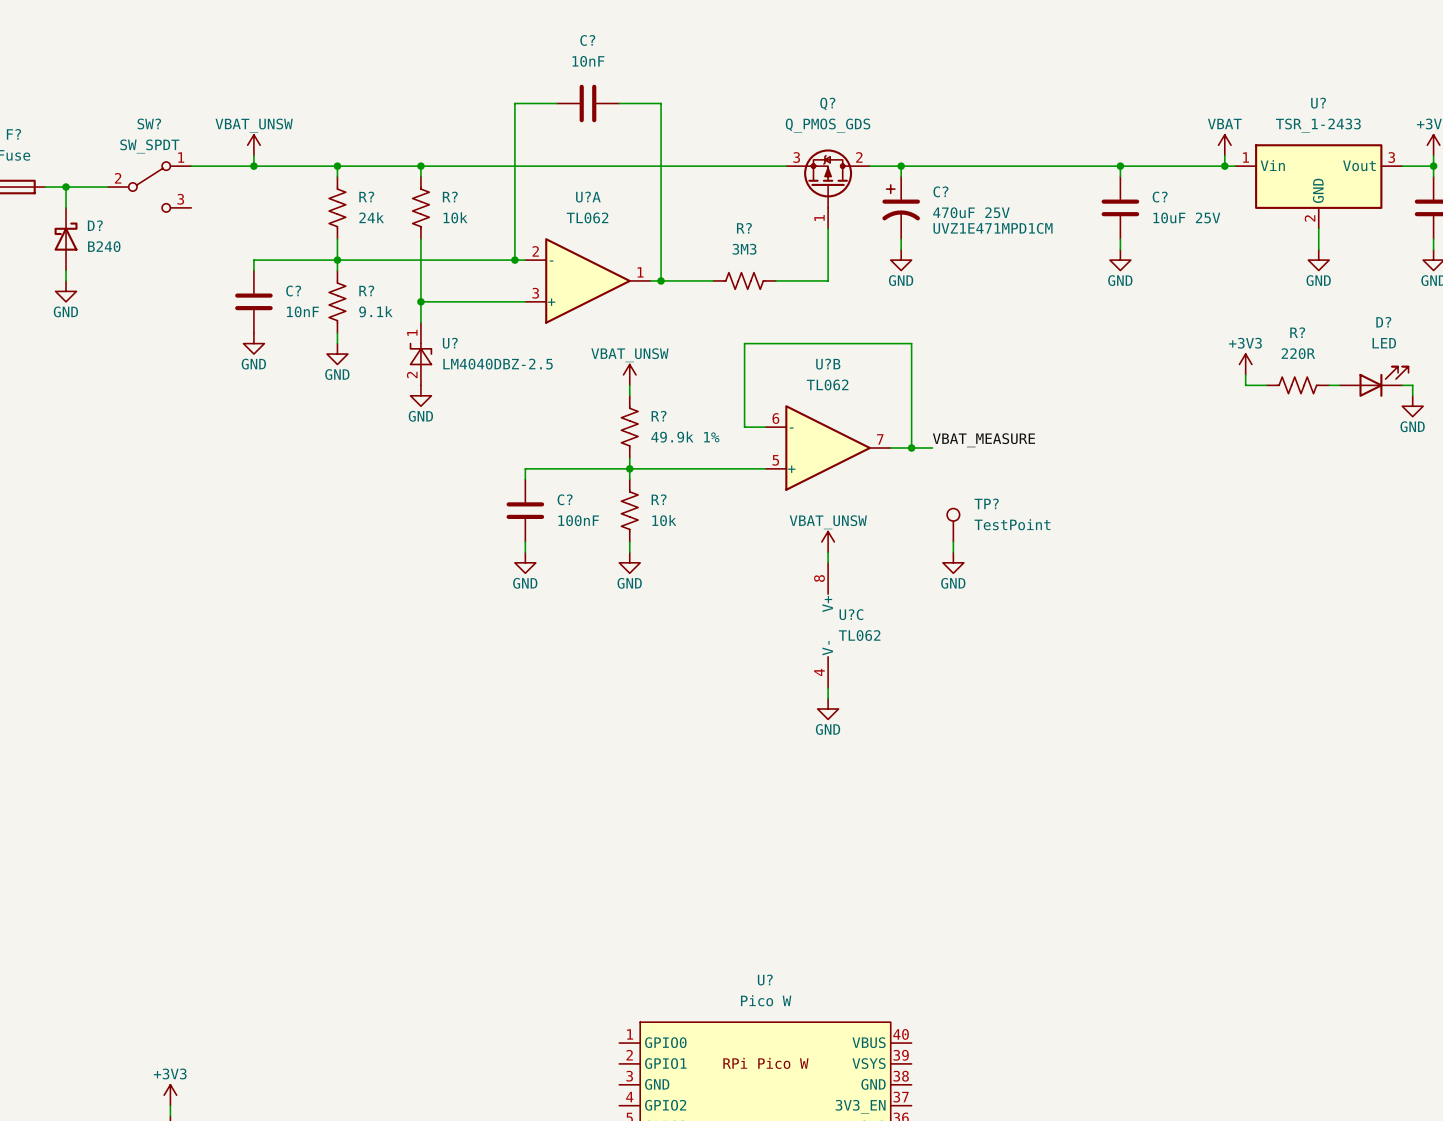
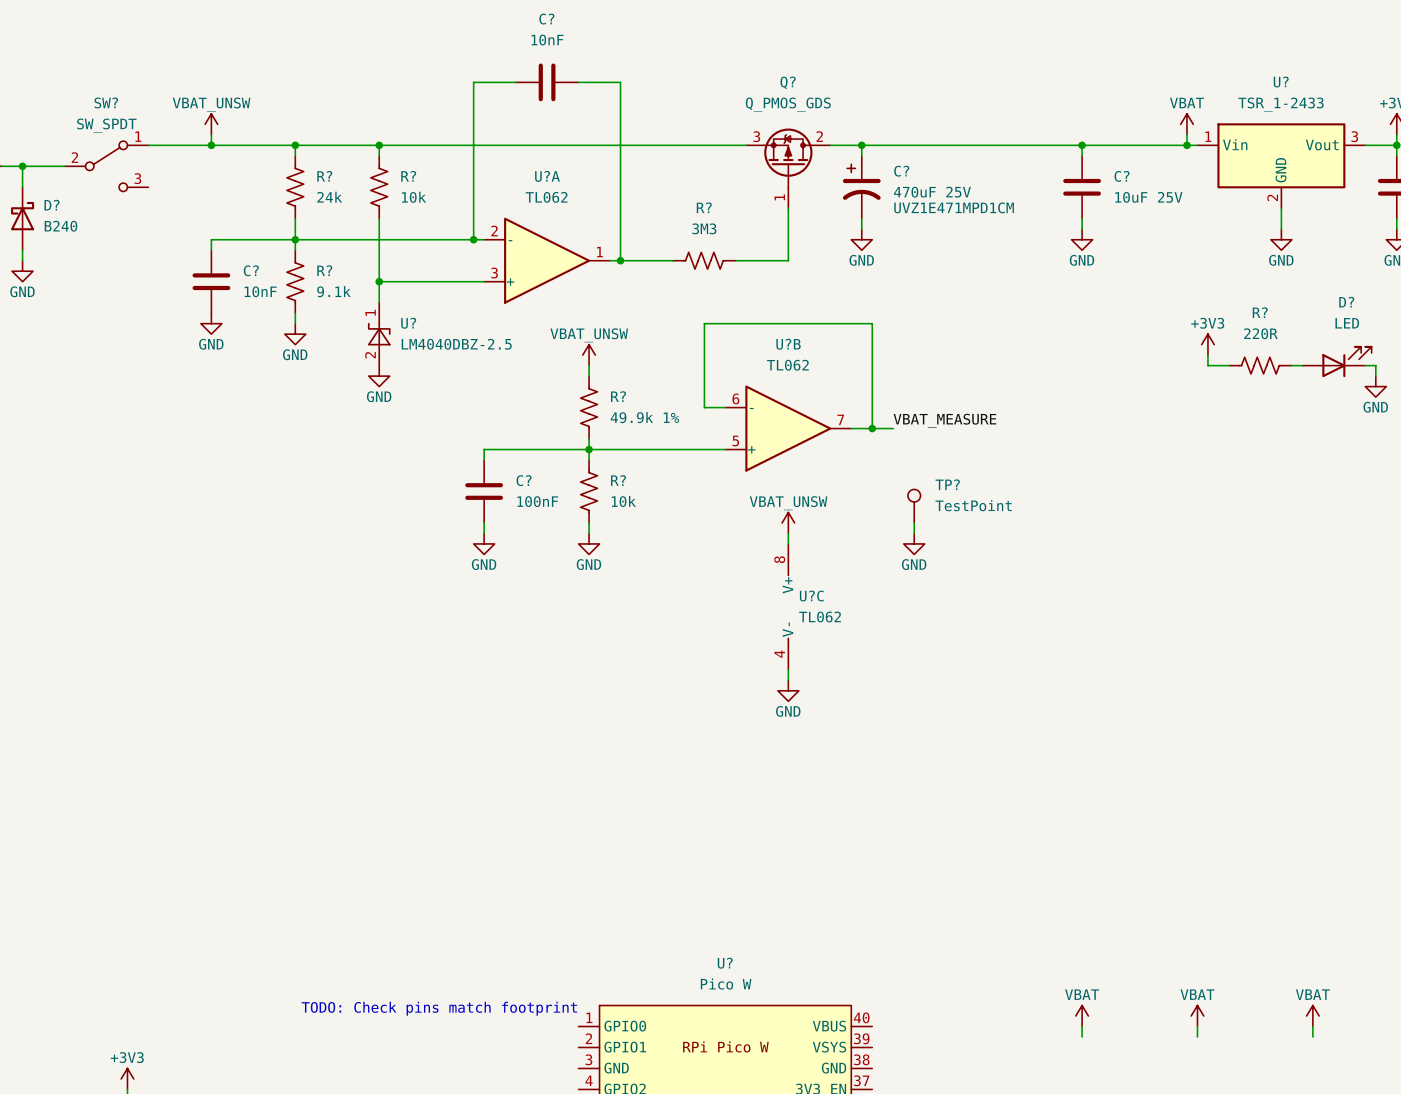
text: none -> TODO: Check pins match footprint (439, 1008)
power symbol: none -> VBAT (1082, 1016)
power symbol: none -> VBAT (1197, 1016)
power symbol: none -> VBAT (1312, 1016)
wire: none -> (1082, 1026) (1082, 1037)
wire: none -> (1197, 1026) (1197, 1037)
wire: none -> (1312, 1026) (1312, 1037)

